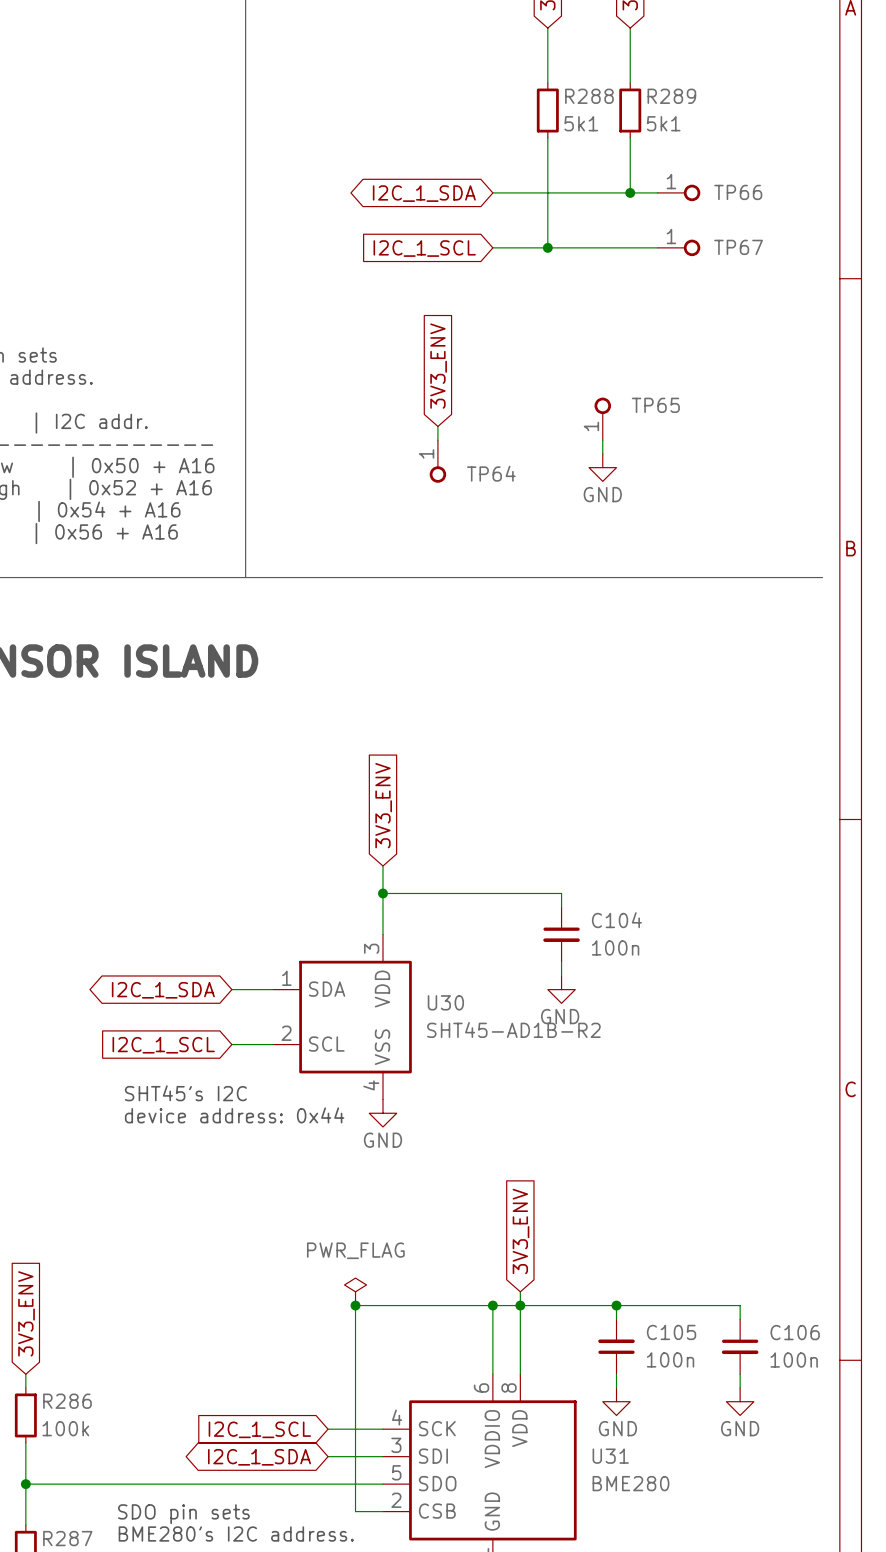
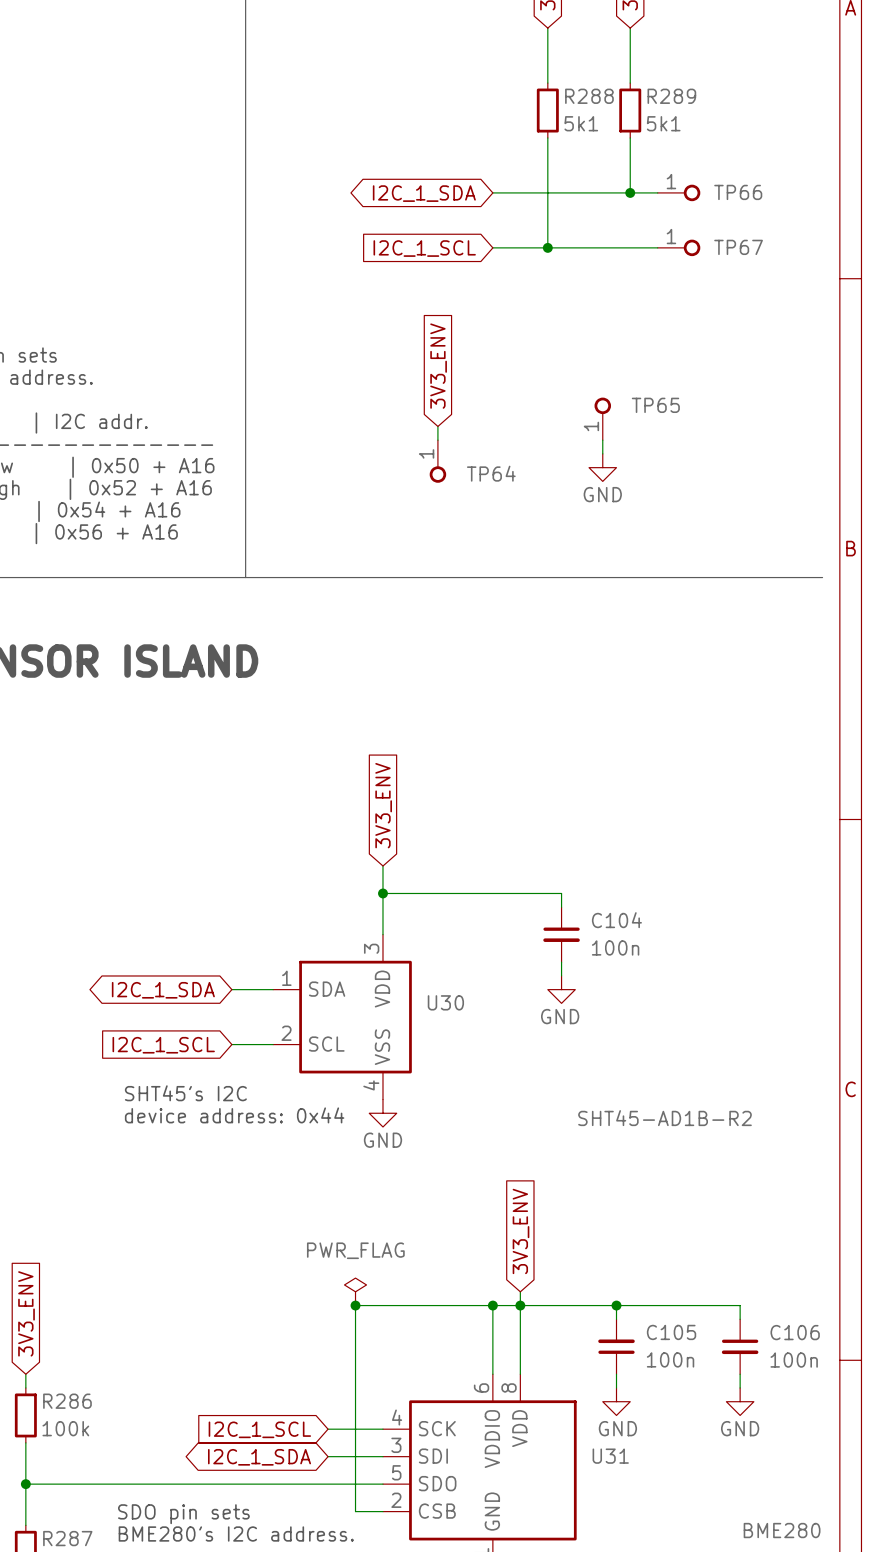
U30 text position: SHT45-AD1B-R2 (513, 1030) -> SHT45-AD1B-R2 (664, 1118)
U31 text position: BME280 (630, 1483) -> BME280 (782, 1530)

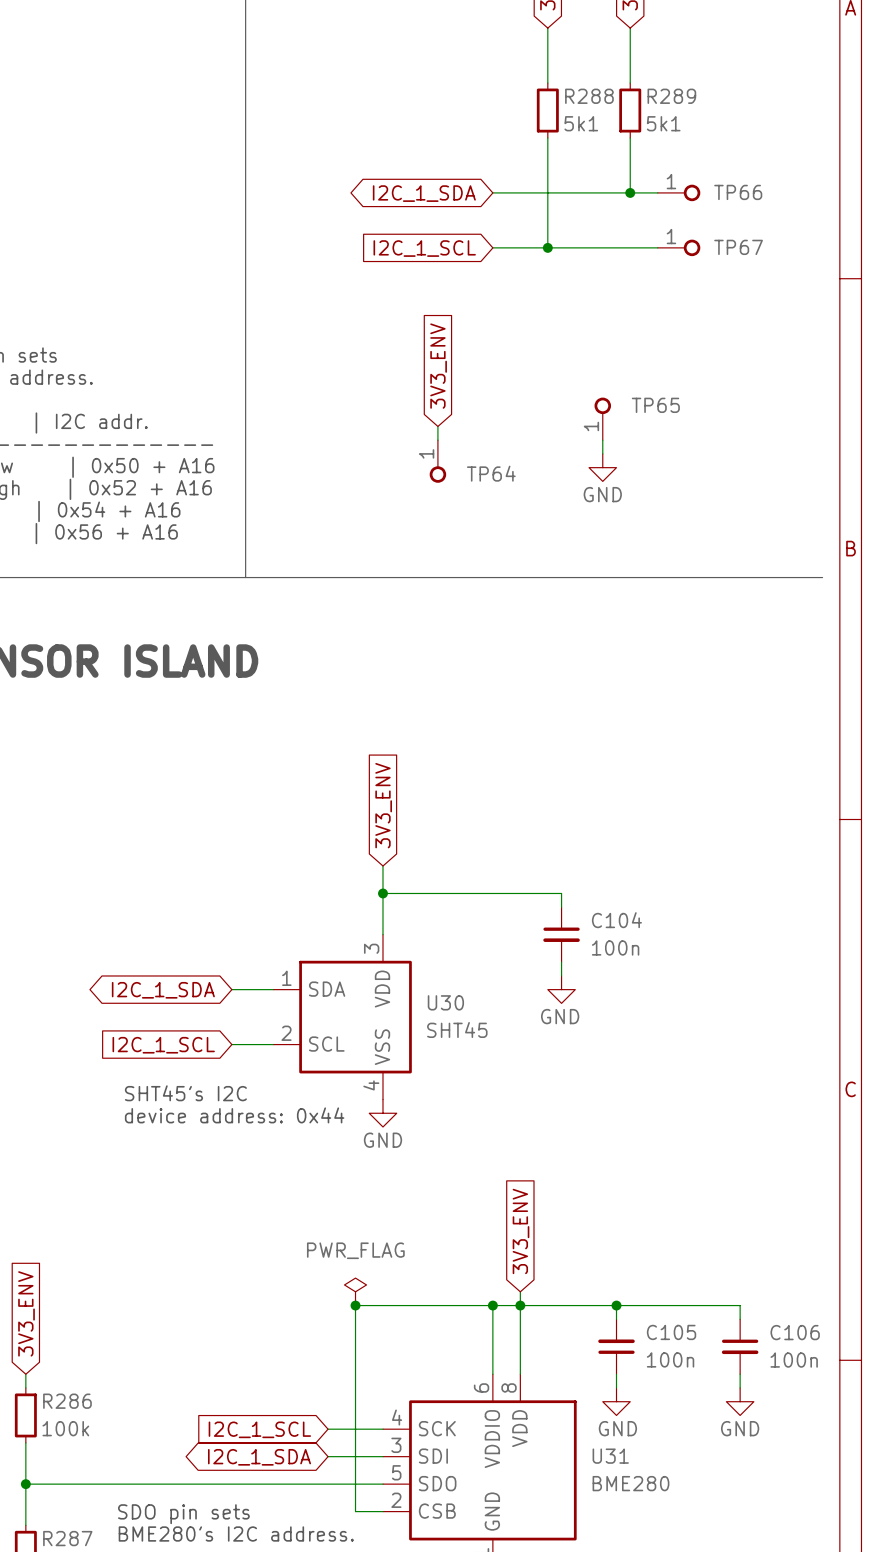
U30 value: none -> SHT45 (457, 1030)
U30 text: SHT45-AD1B-R2 (664, 1118) -> none
U31 value: none -> BME280 (630, 1483)
U31 text: BME280 (782, 1530) -> none

